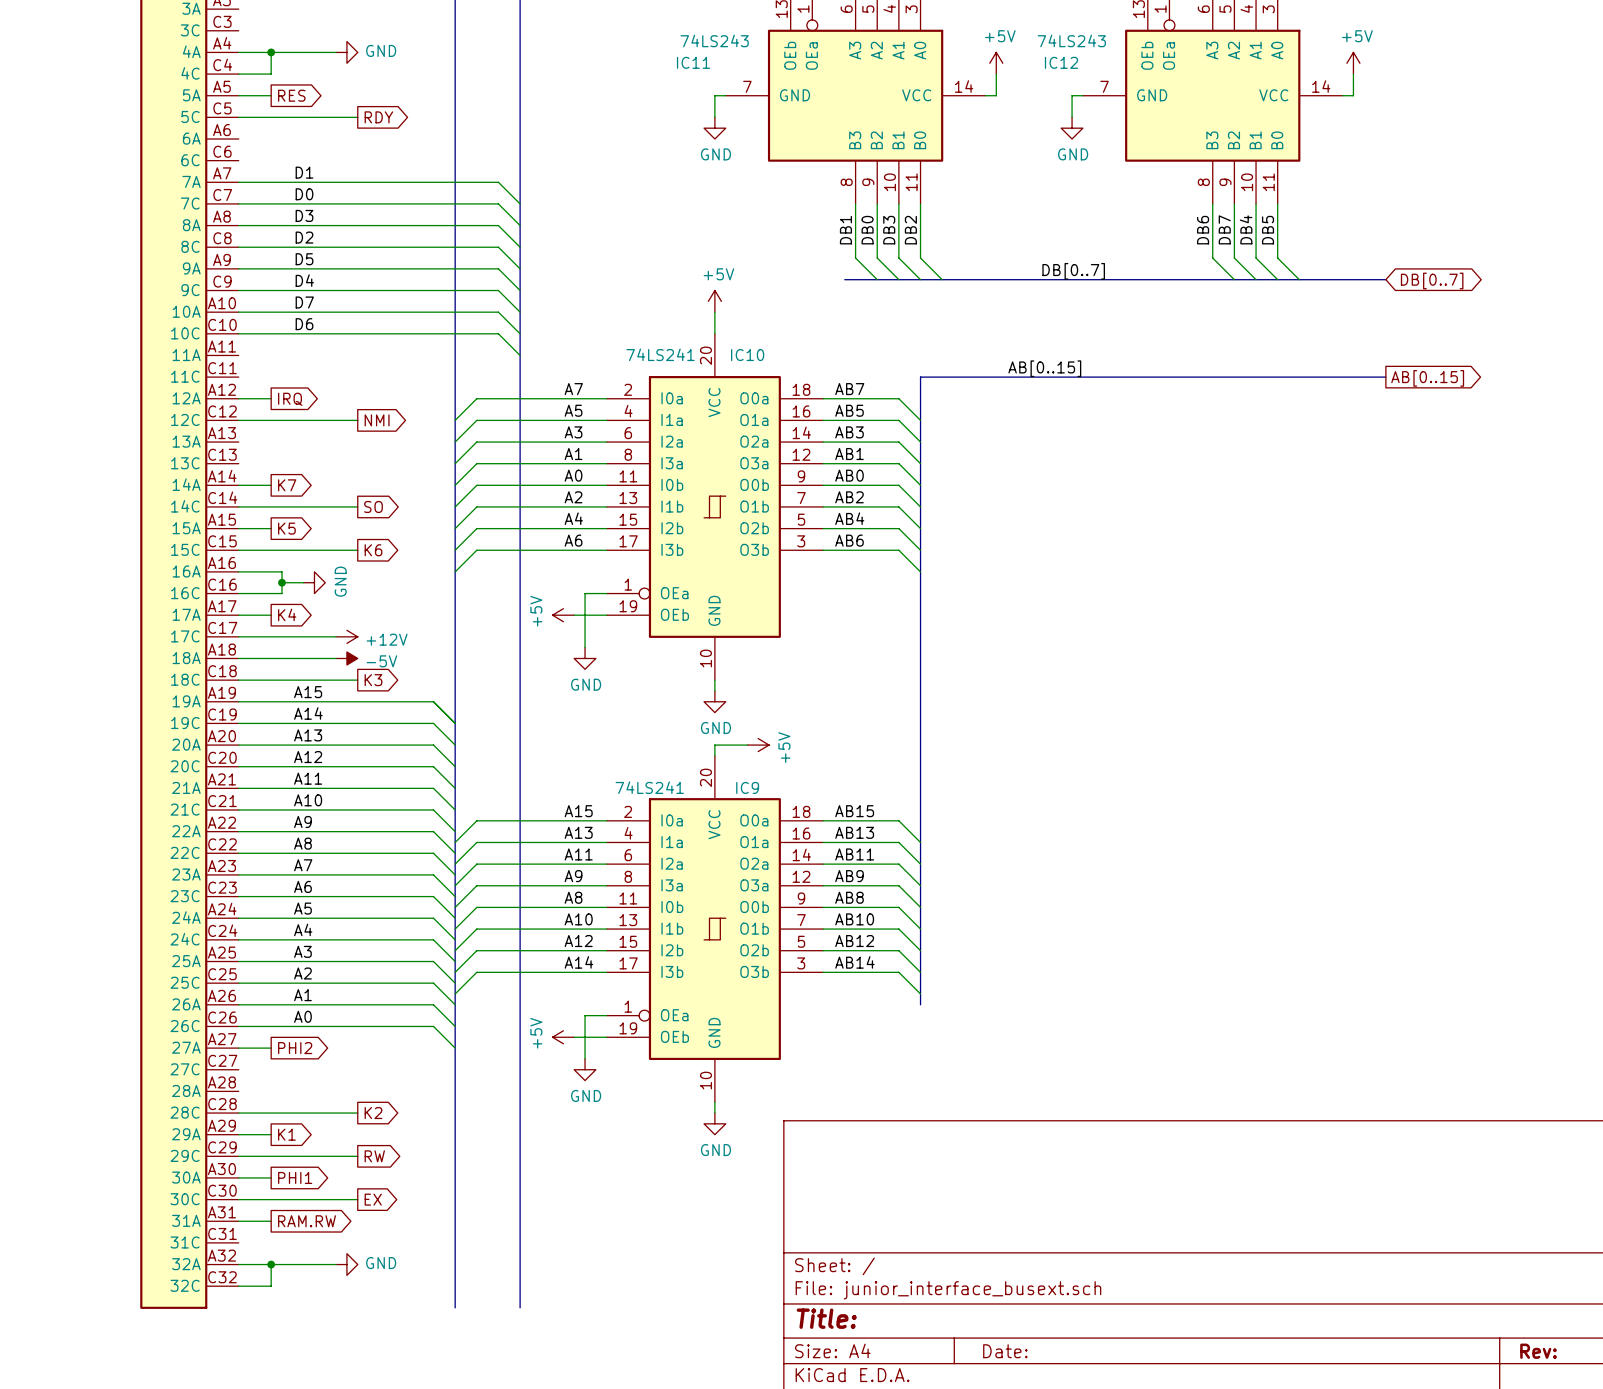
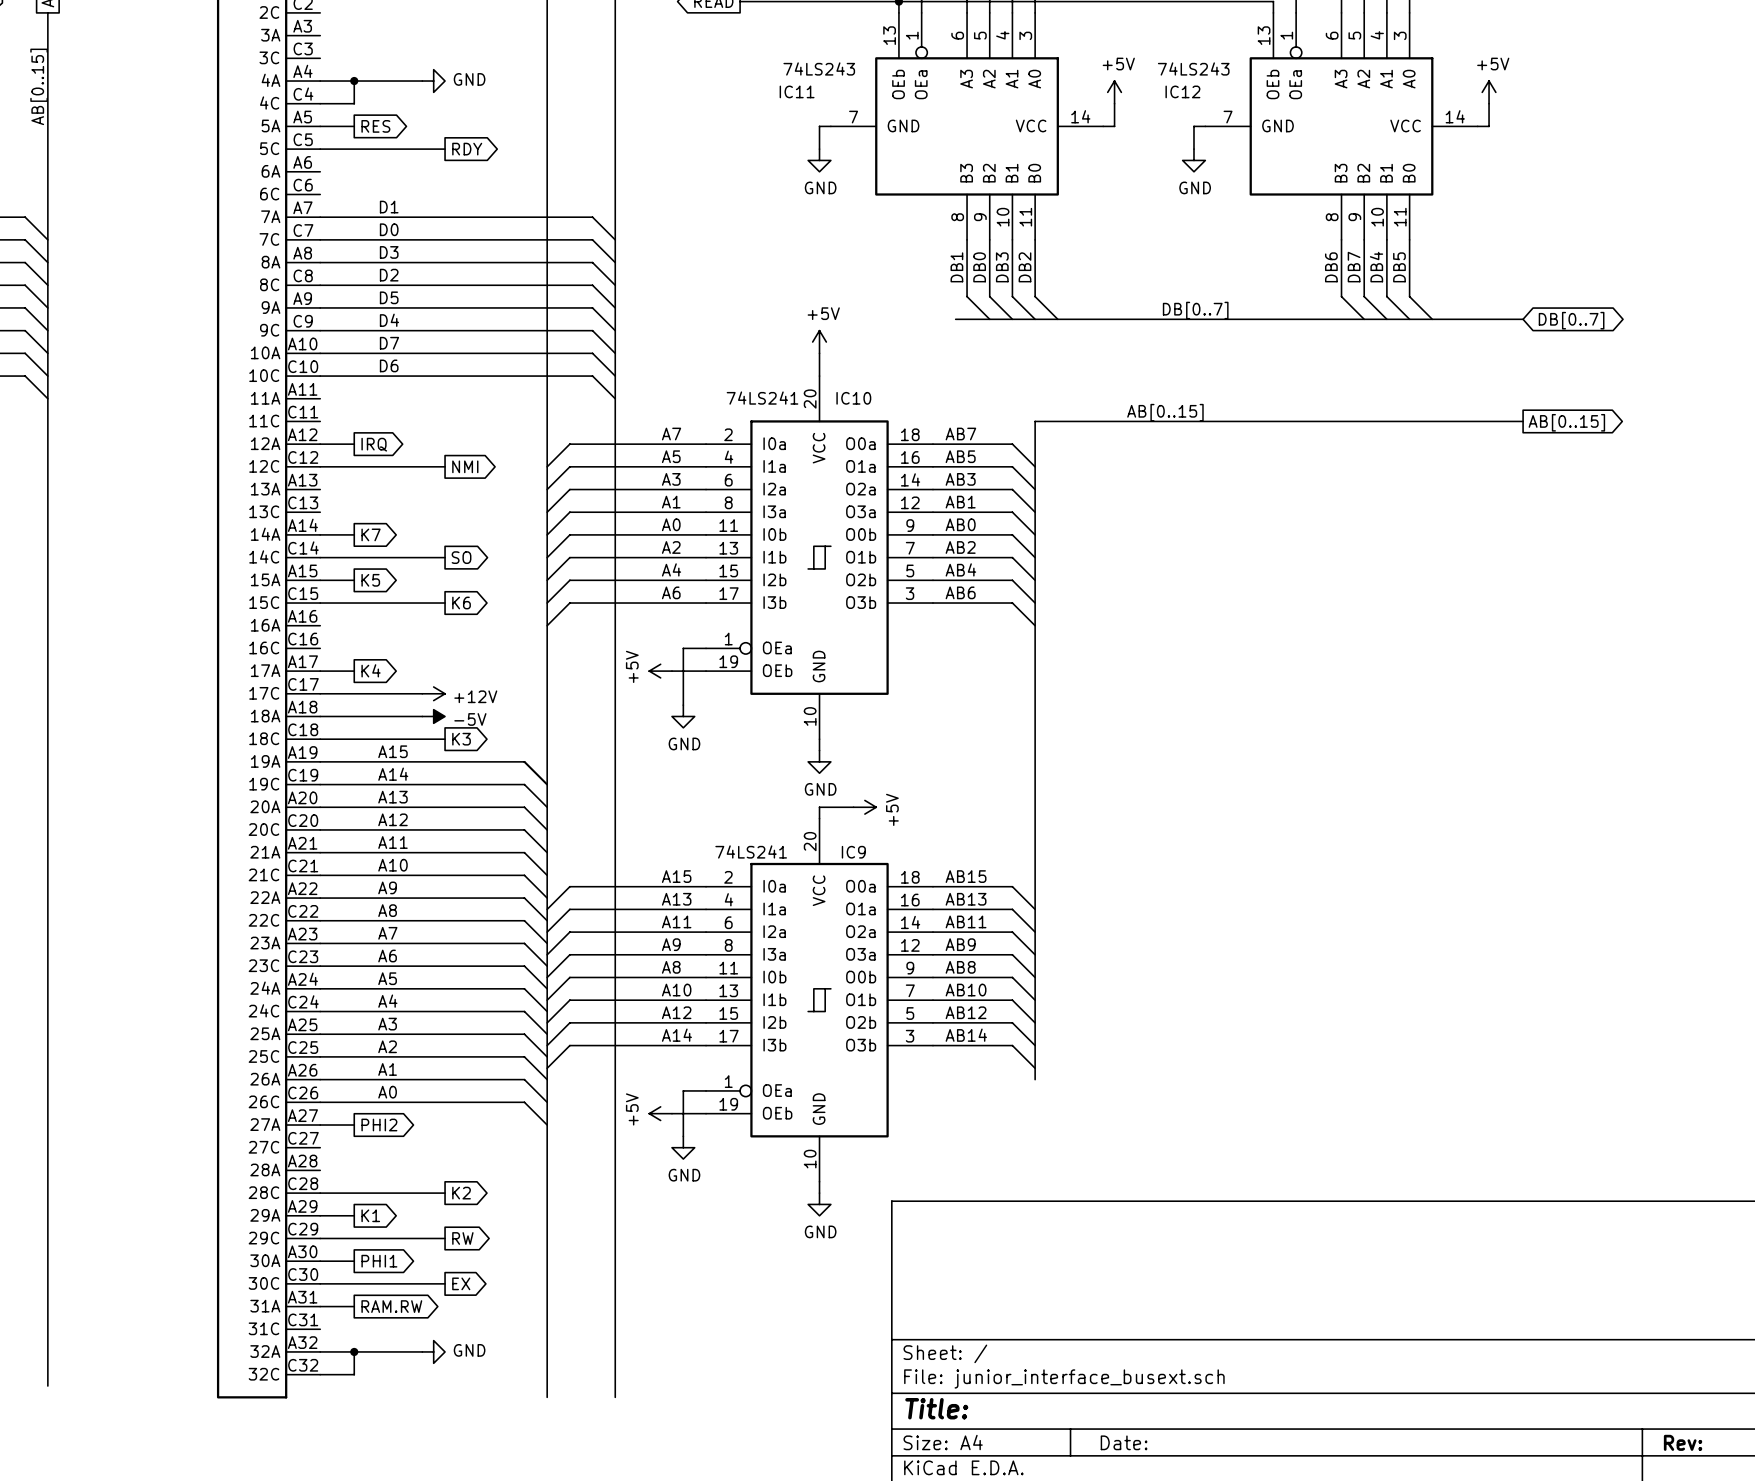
wire: (238, 571) (282, 571) (282, 593) (238, 593) -> none
wire: (282, 582) (303, 582) -> none
junction: (282, 582) -> none
power symbol: GND (314, 582) -> none

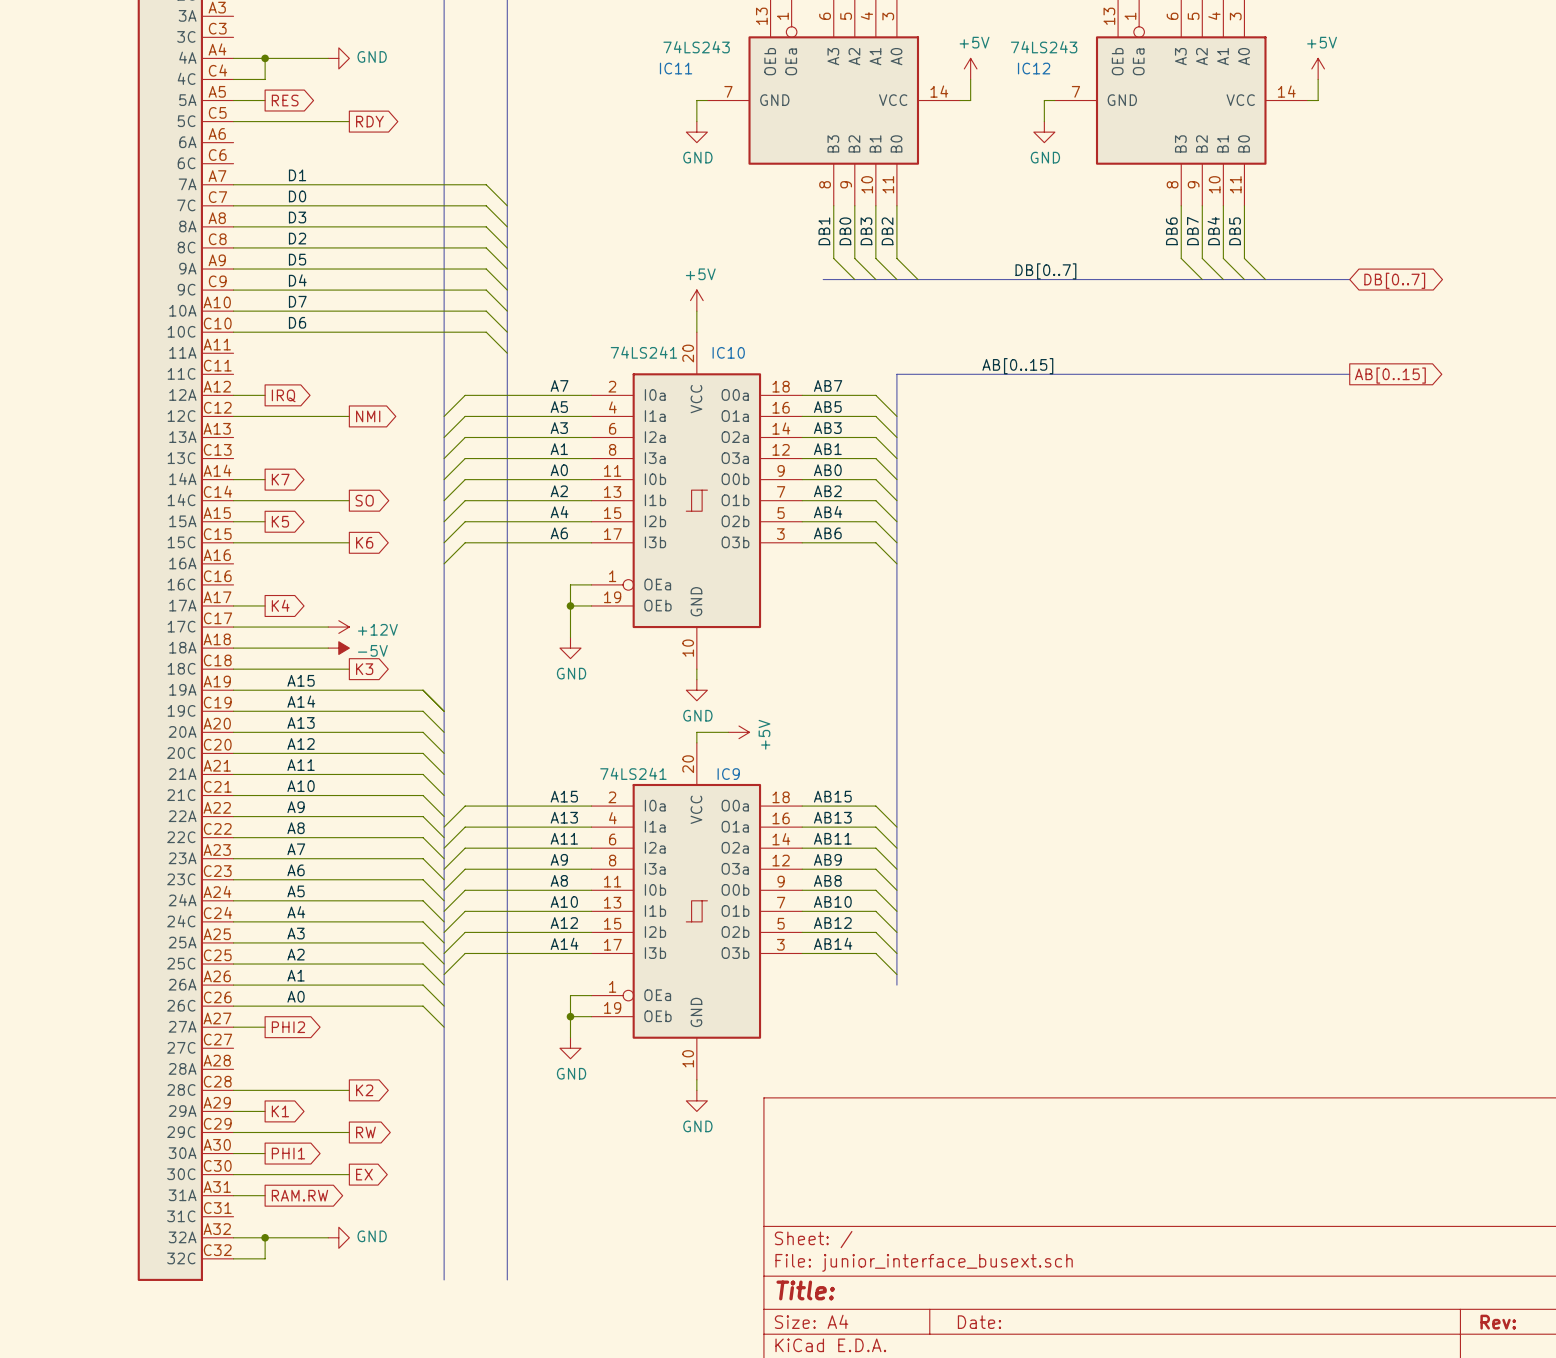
power symbol: +5V (660, 671) -> none
wire: (671, 671) (683, 671) -> none
junction: none -> (570, 605)
power symbol: +5V (660, 1113) -> none
wire: (671, 1113) (683, 1113) -> none
junction: none -> (570, 1016)

